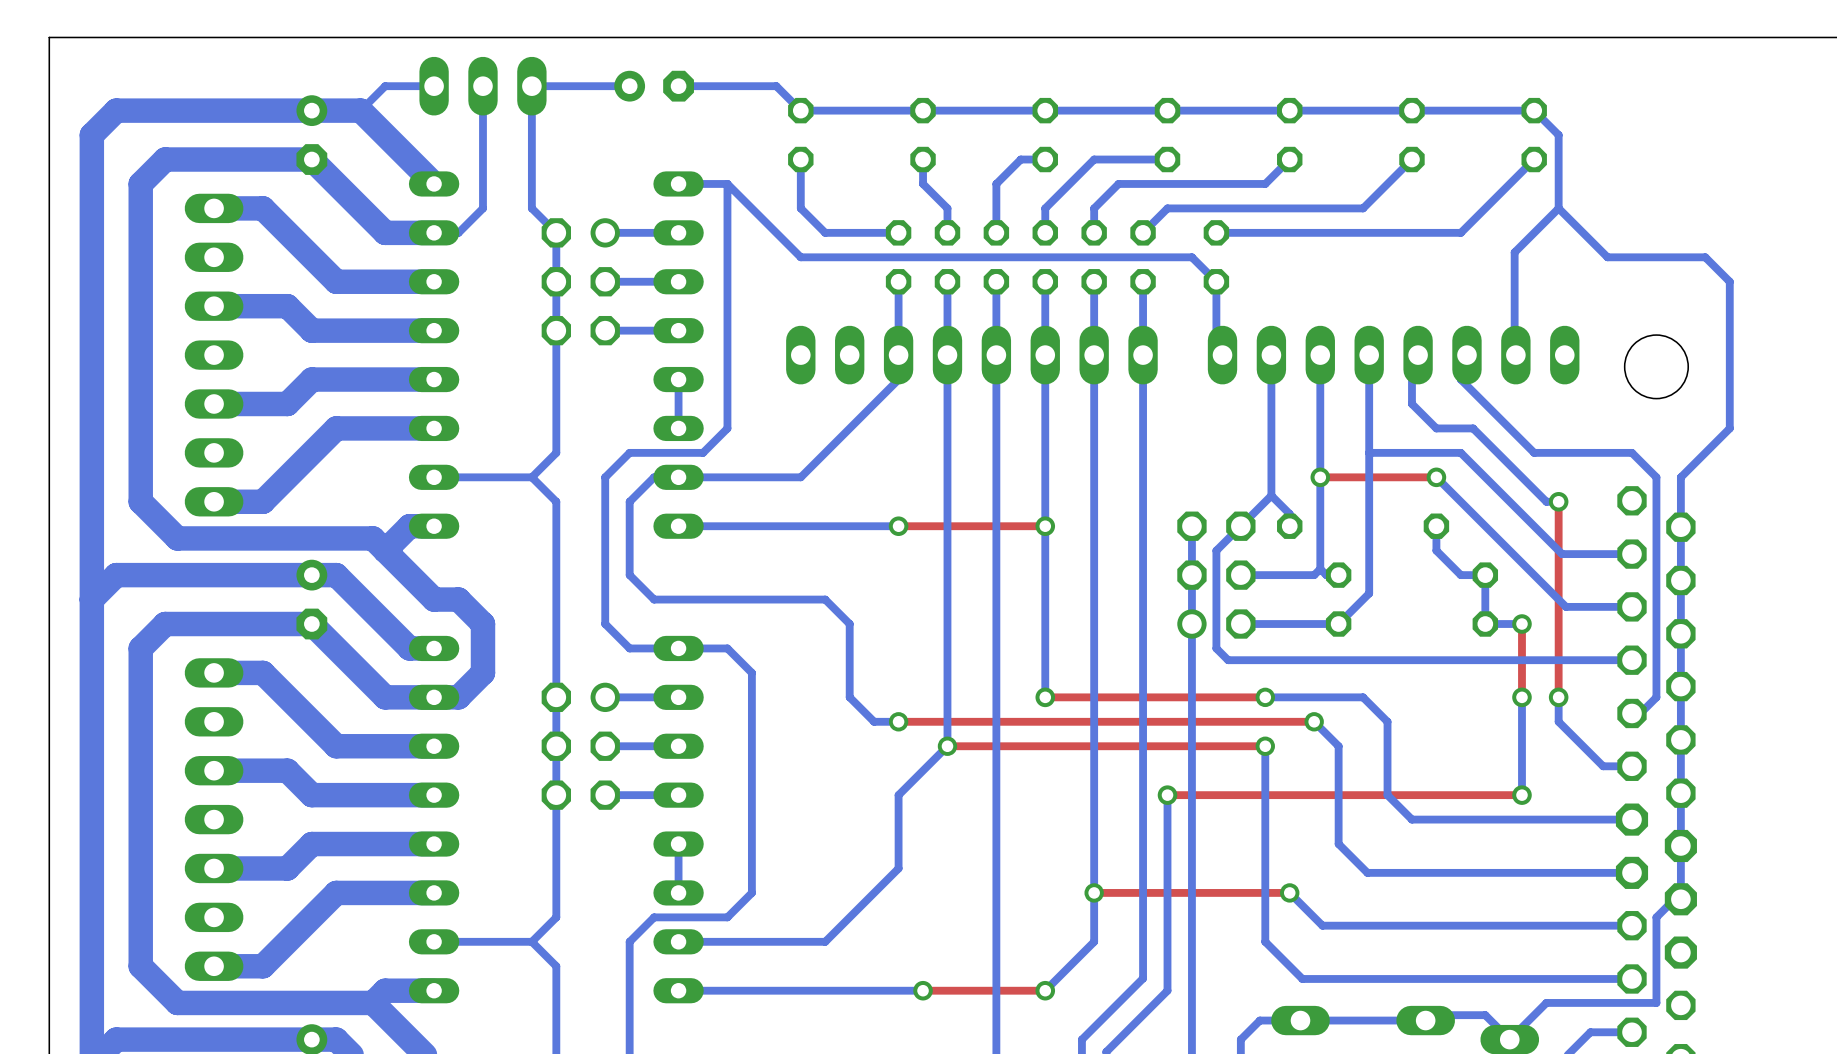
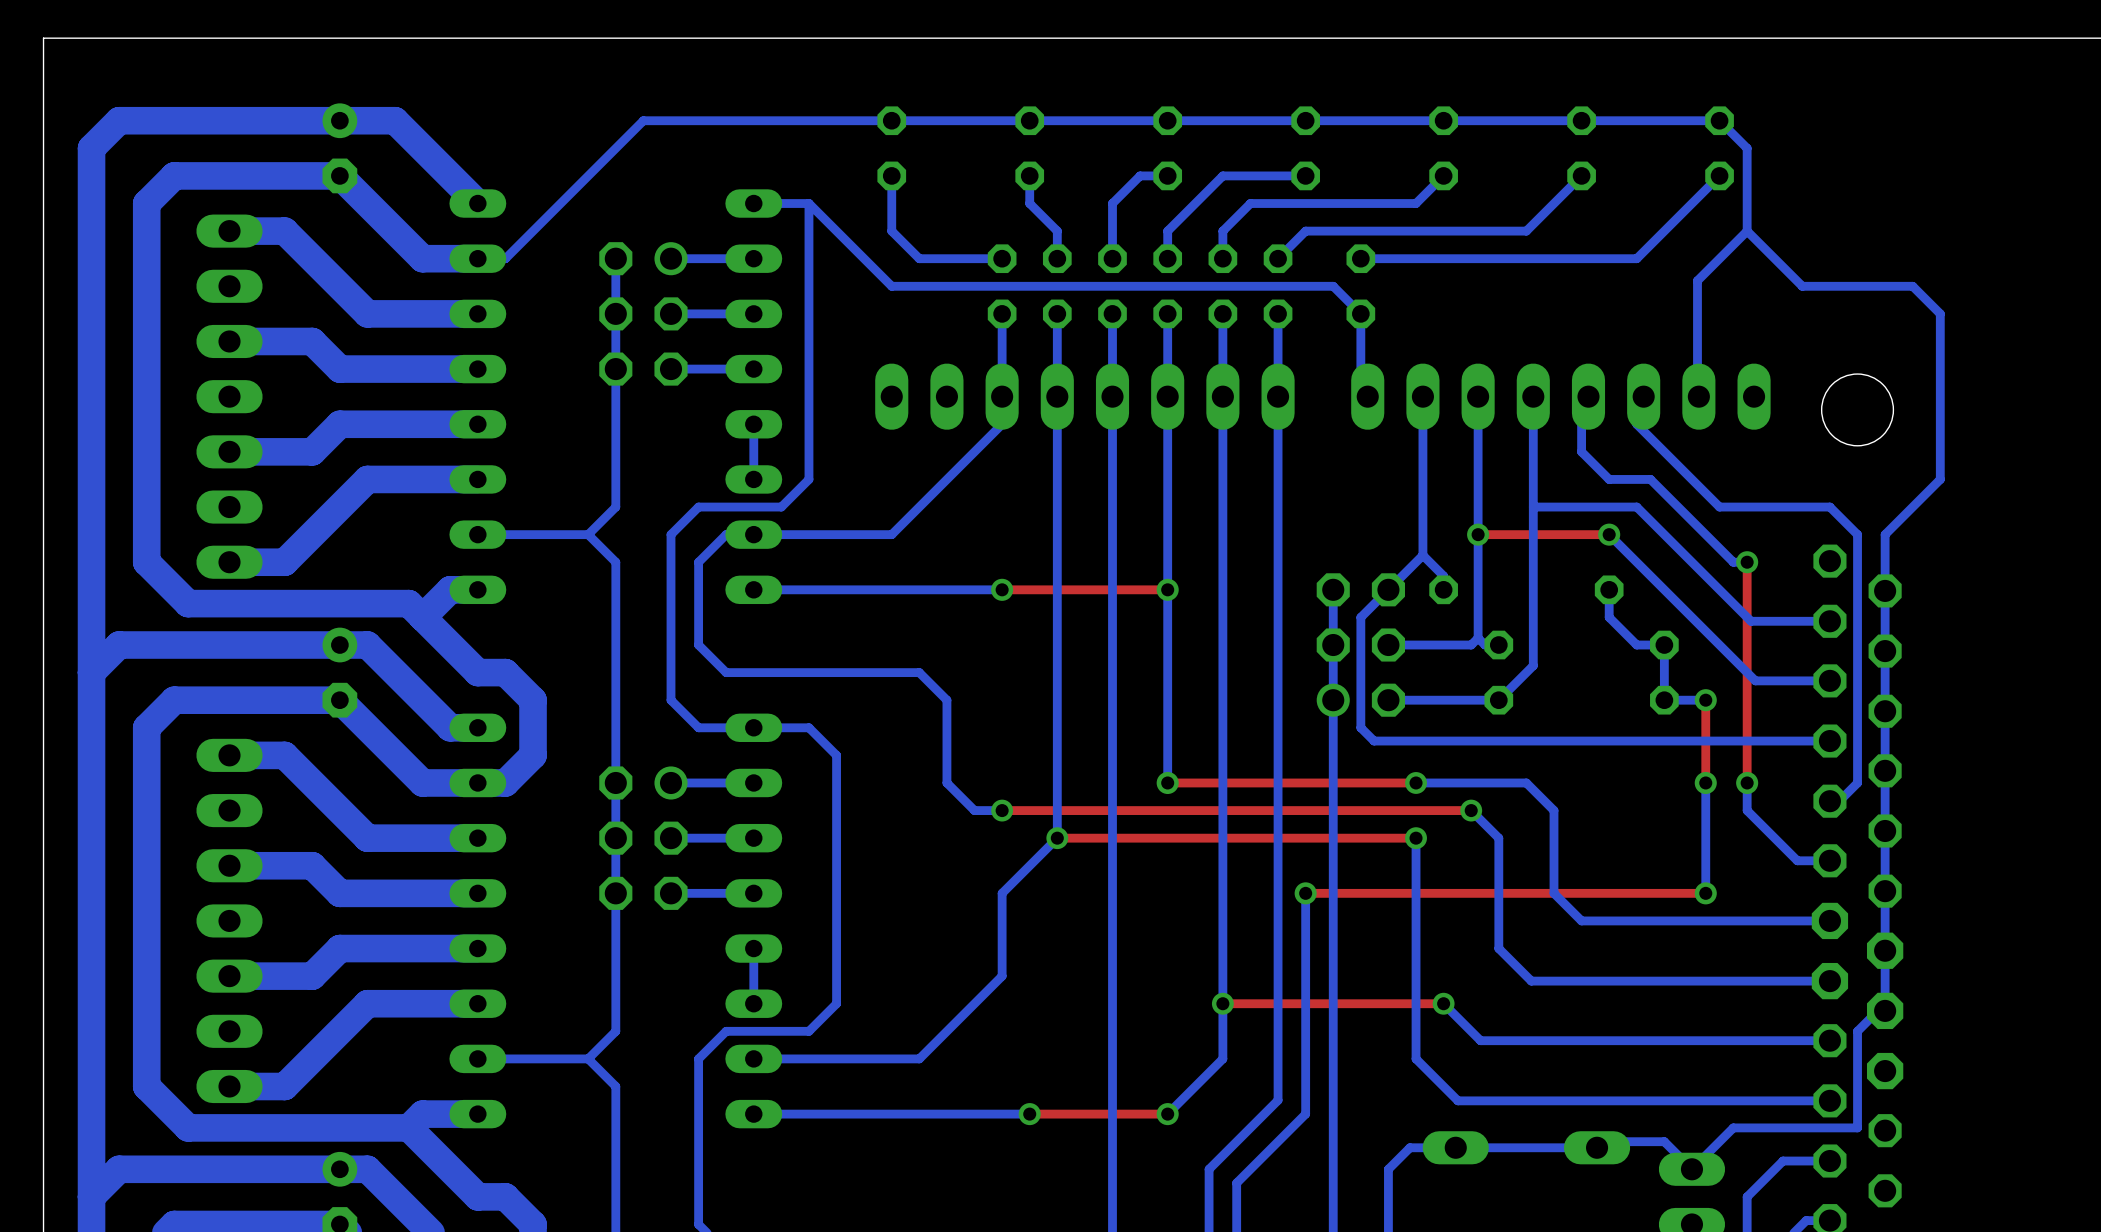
bottom track: (434, 86) (385, 86) (360, 110) -> none
bottom track: (482, 86) (482, 208) -> none
part: (482, 86) -> none
bottom track: (629, 86) (531, 86) (531, 208) (556, 232) -> none
part: (654, 86) -> none
bottom track: (678, 86) (776, 86) (800, 110) -> (533, 231) (643, 120) (891, 120)

